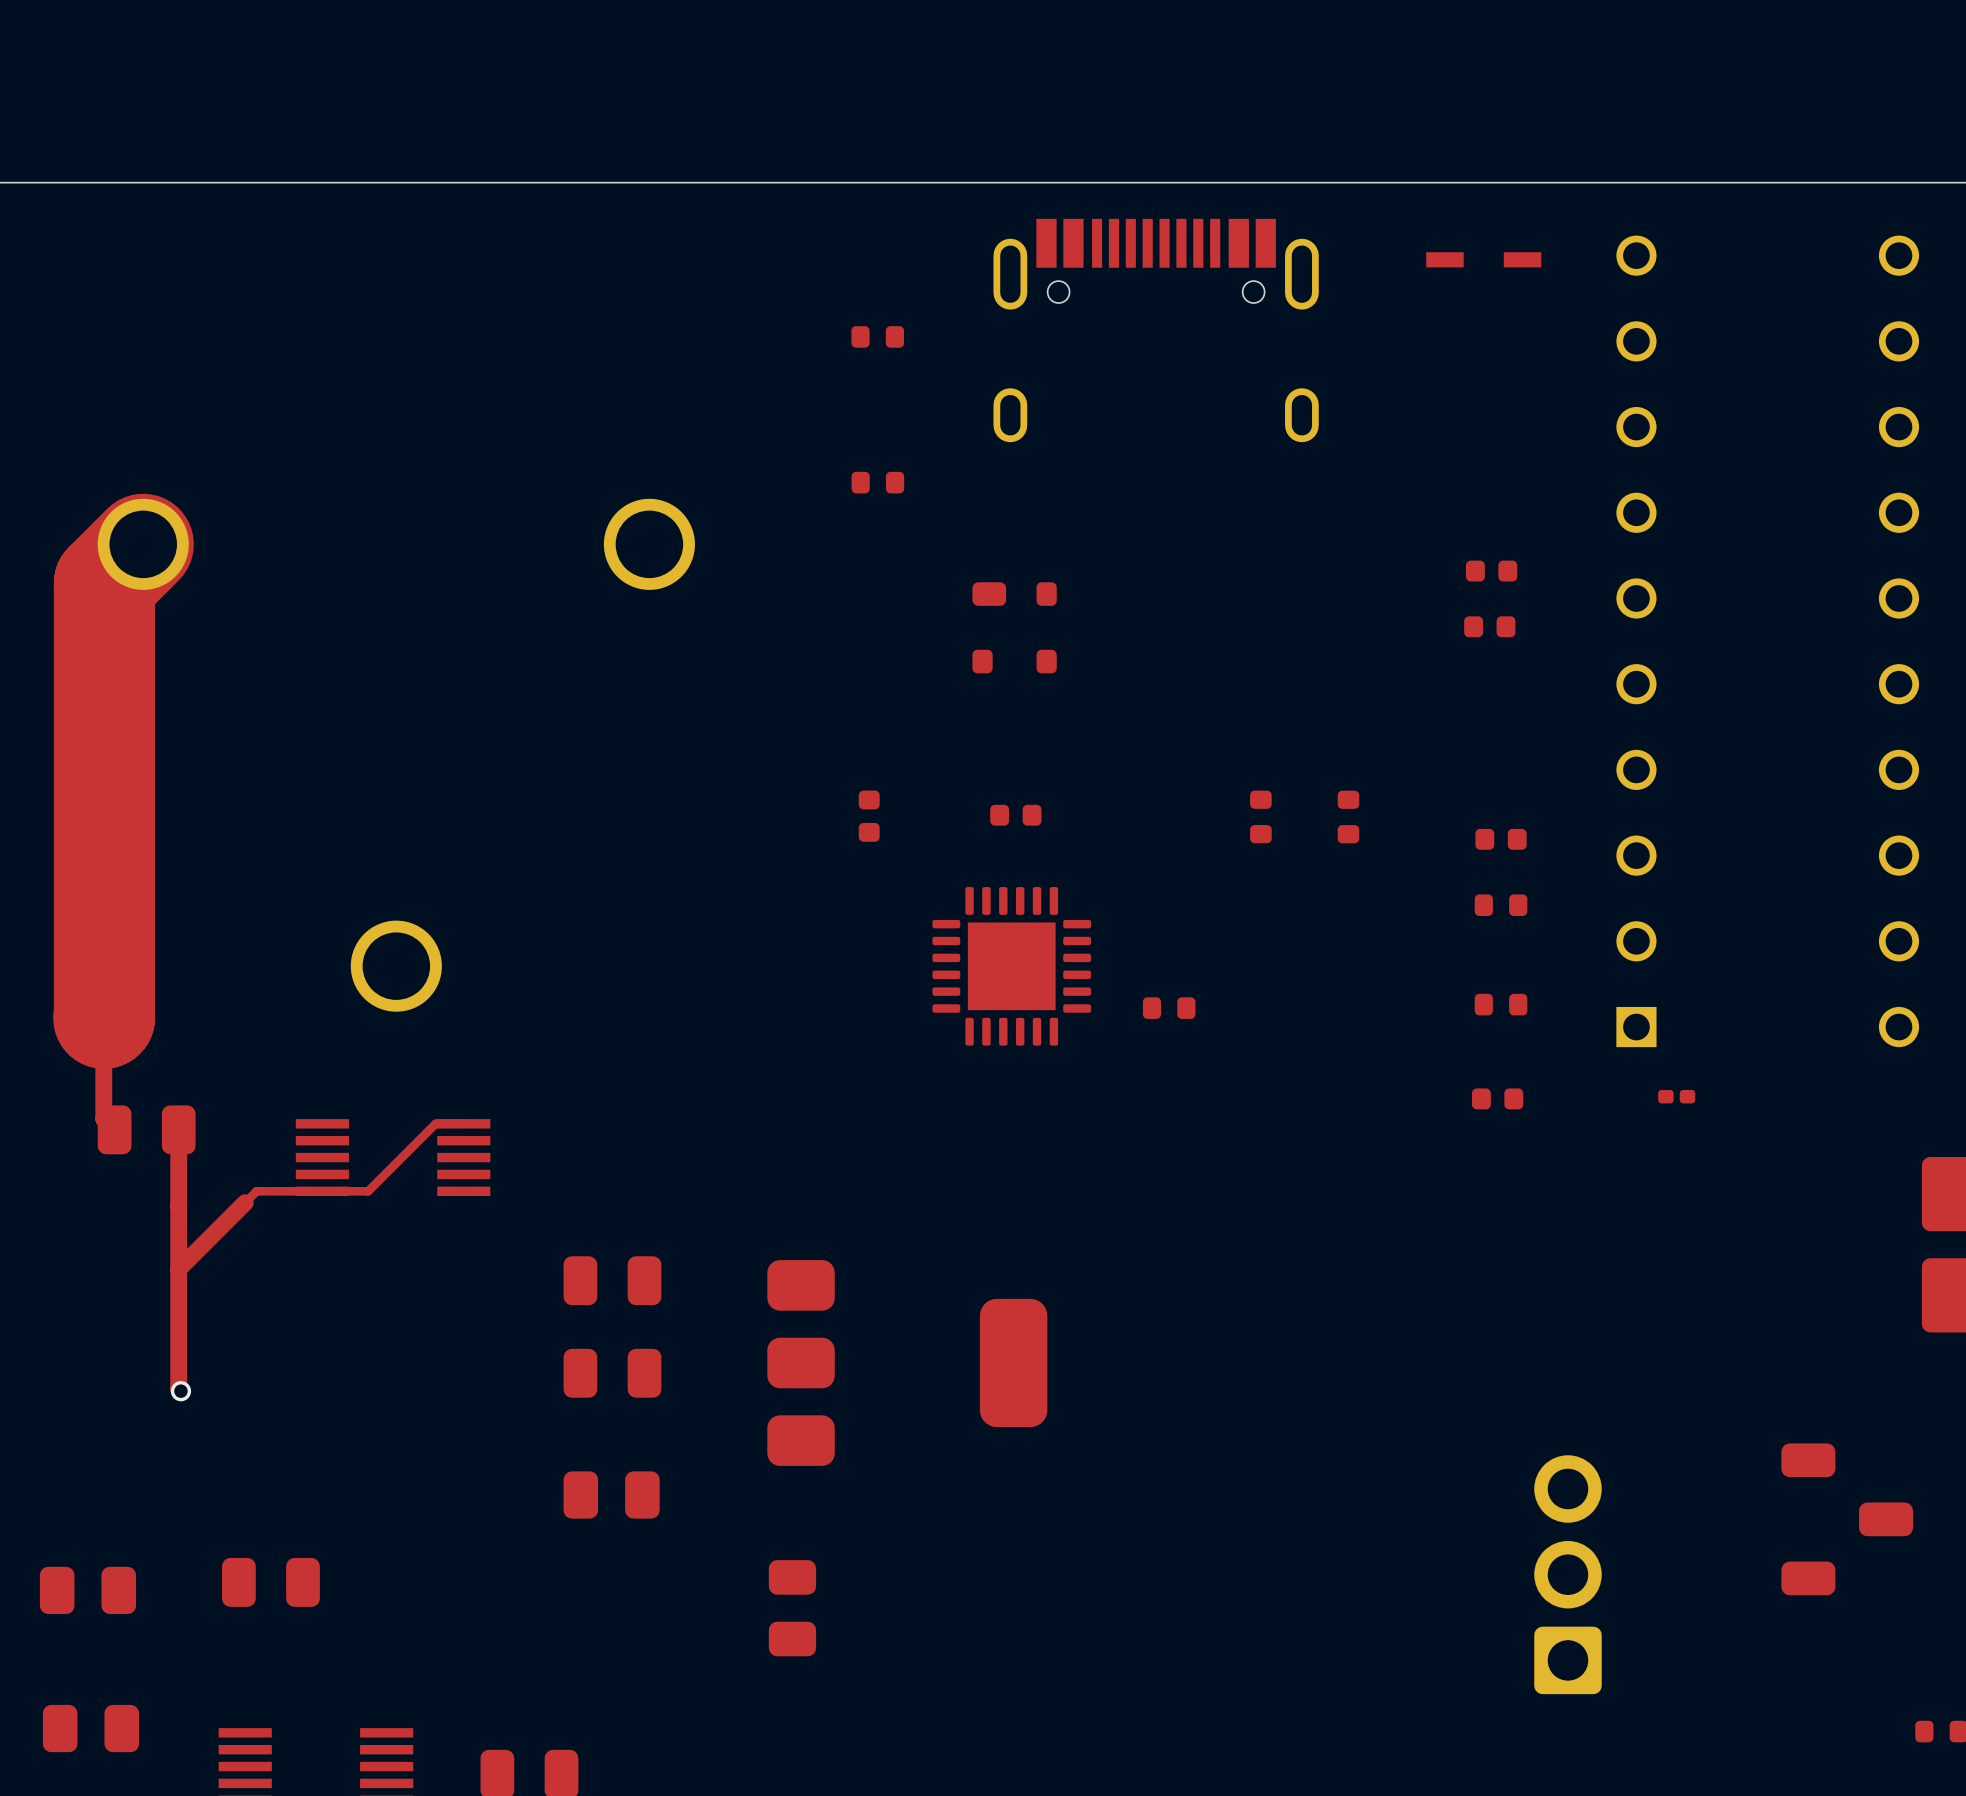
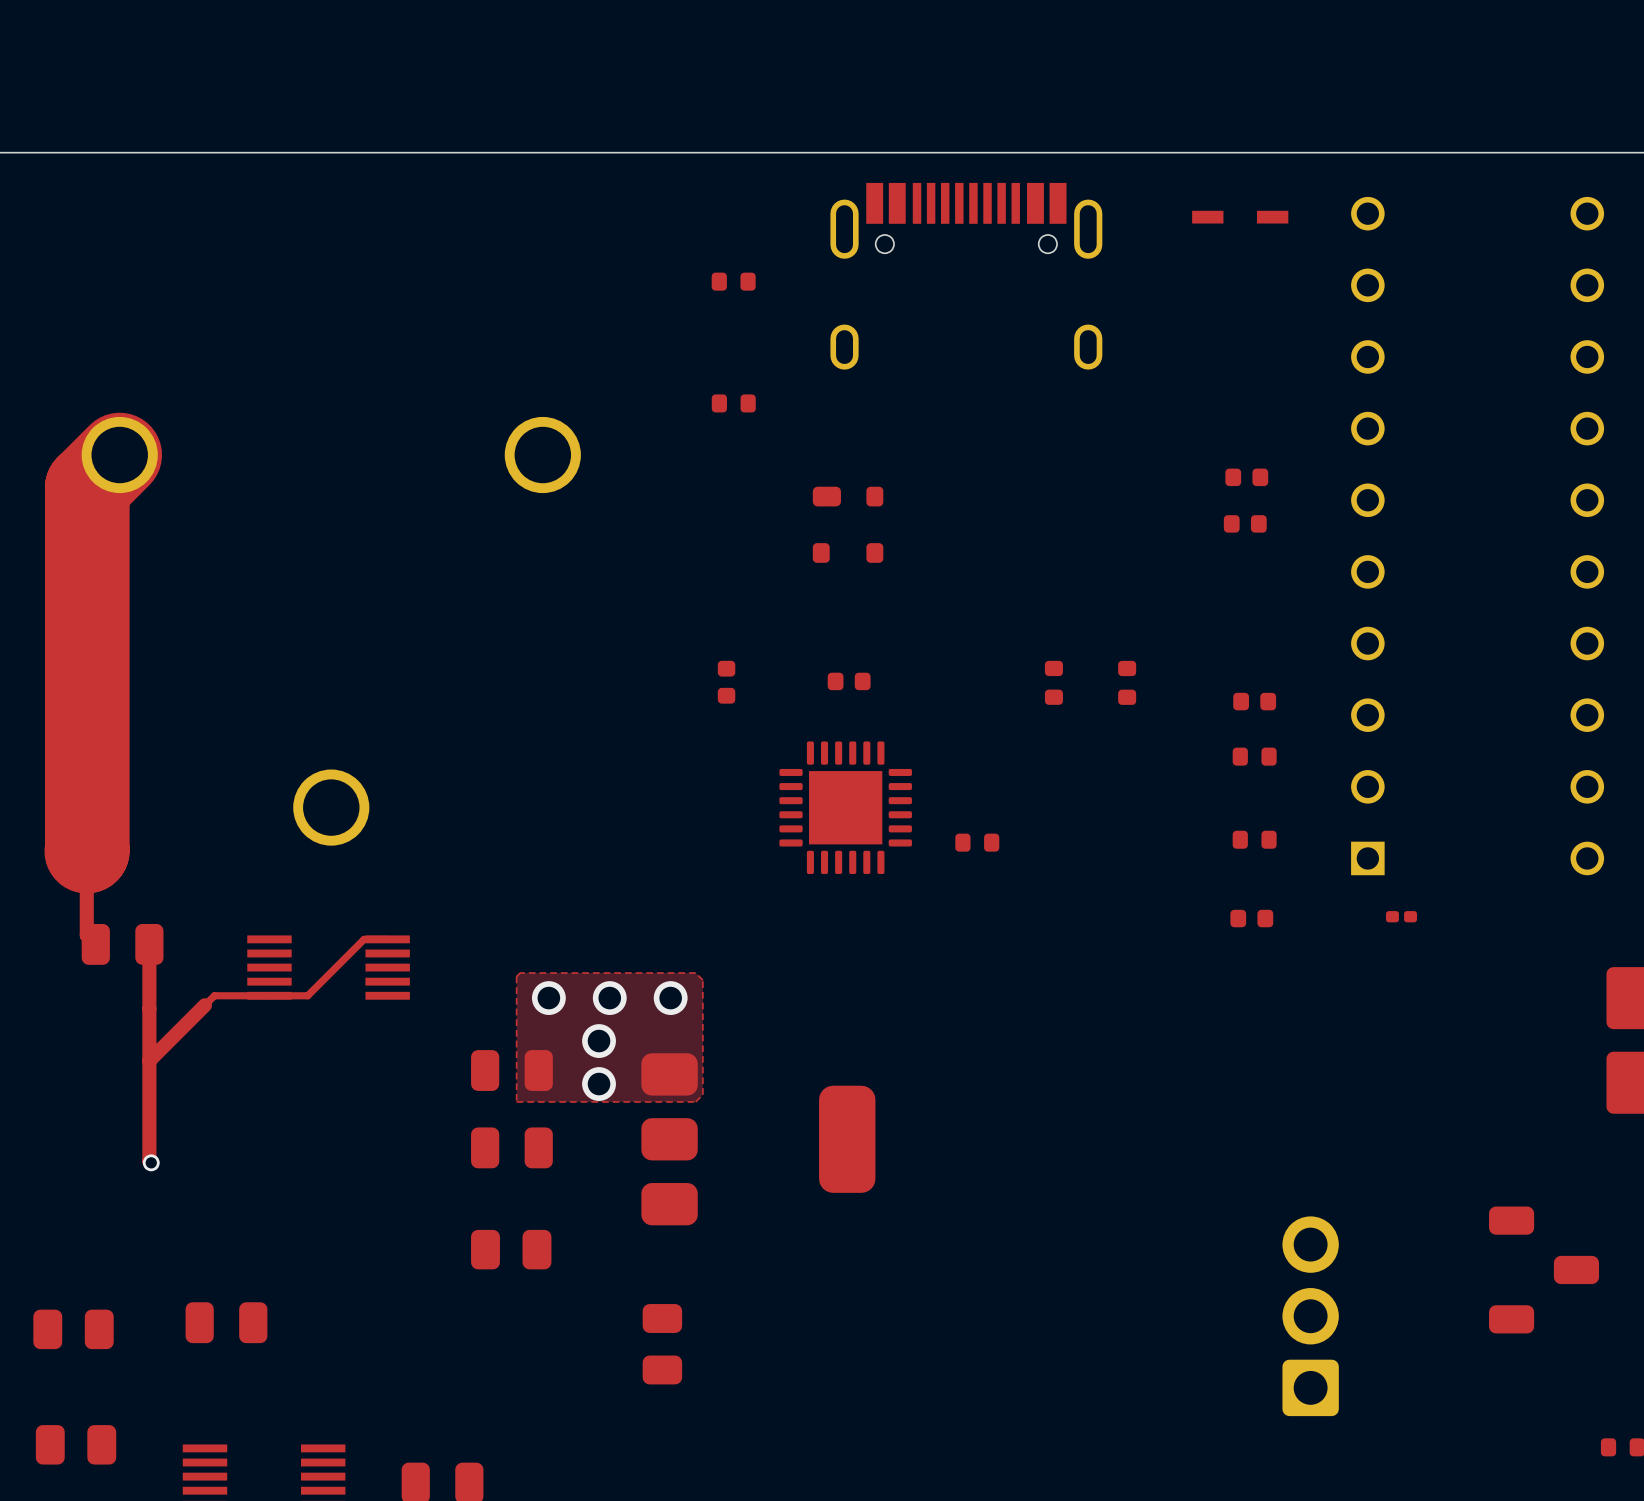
top zone outline: none -> (695, 972) (702, 980) (702, 1094) (695, 1101) (516, 1101) (516, 976) (520, 972) (695, 972)
via: none -> (548, 998)
via: none -> (609, 998)
via: none -> (670, 998)
via: none -> (599, 1041)
via: none -> (599, 1084)

